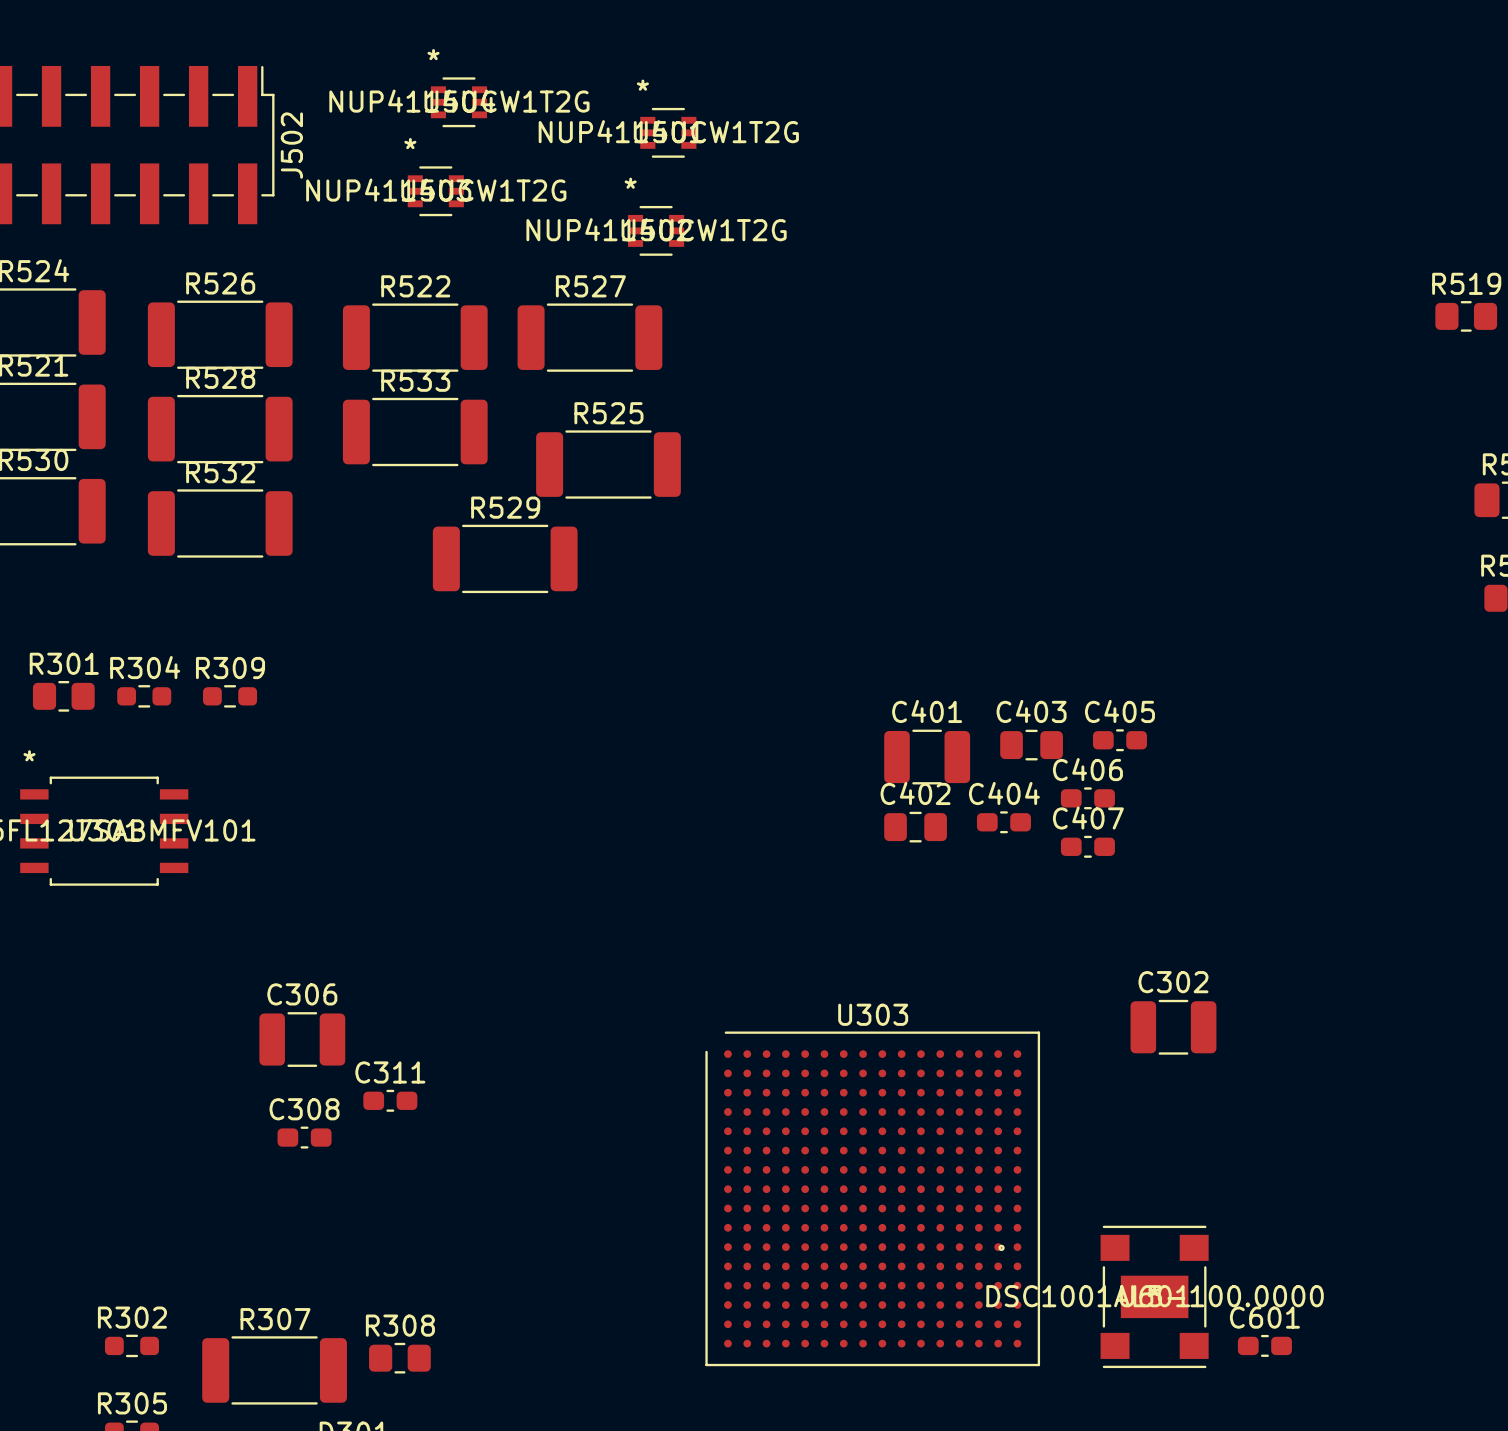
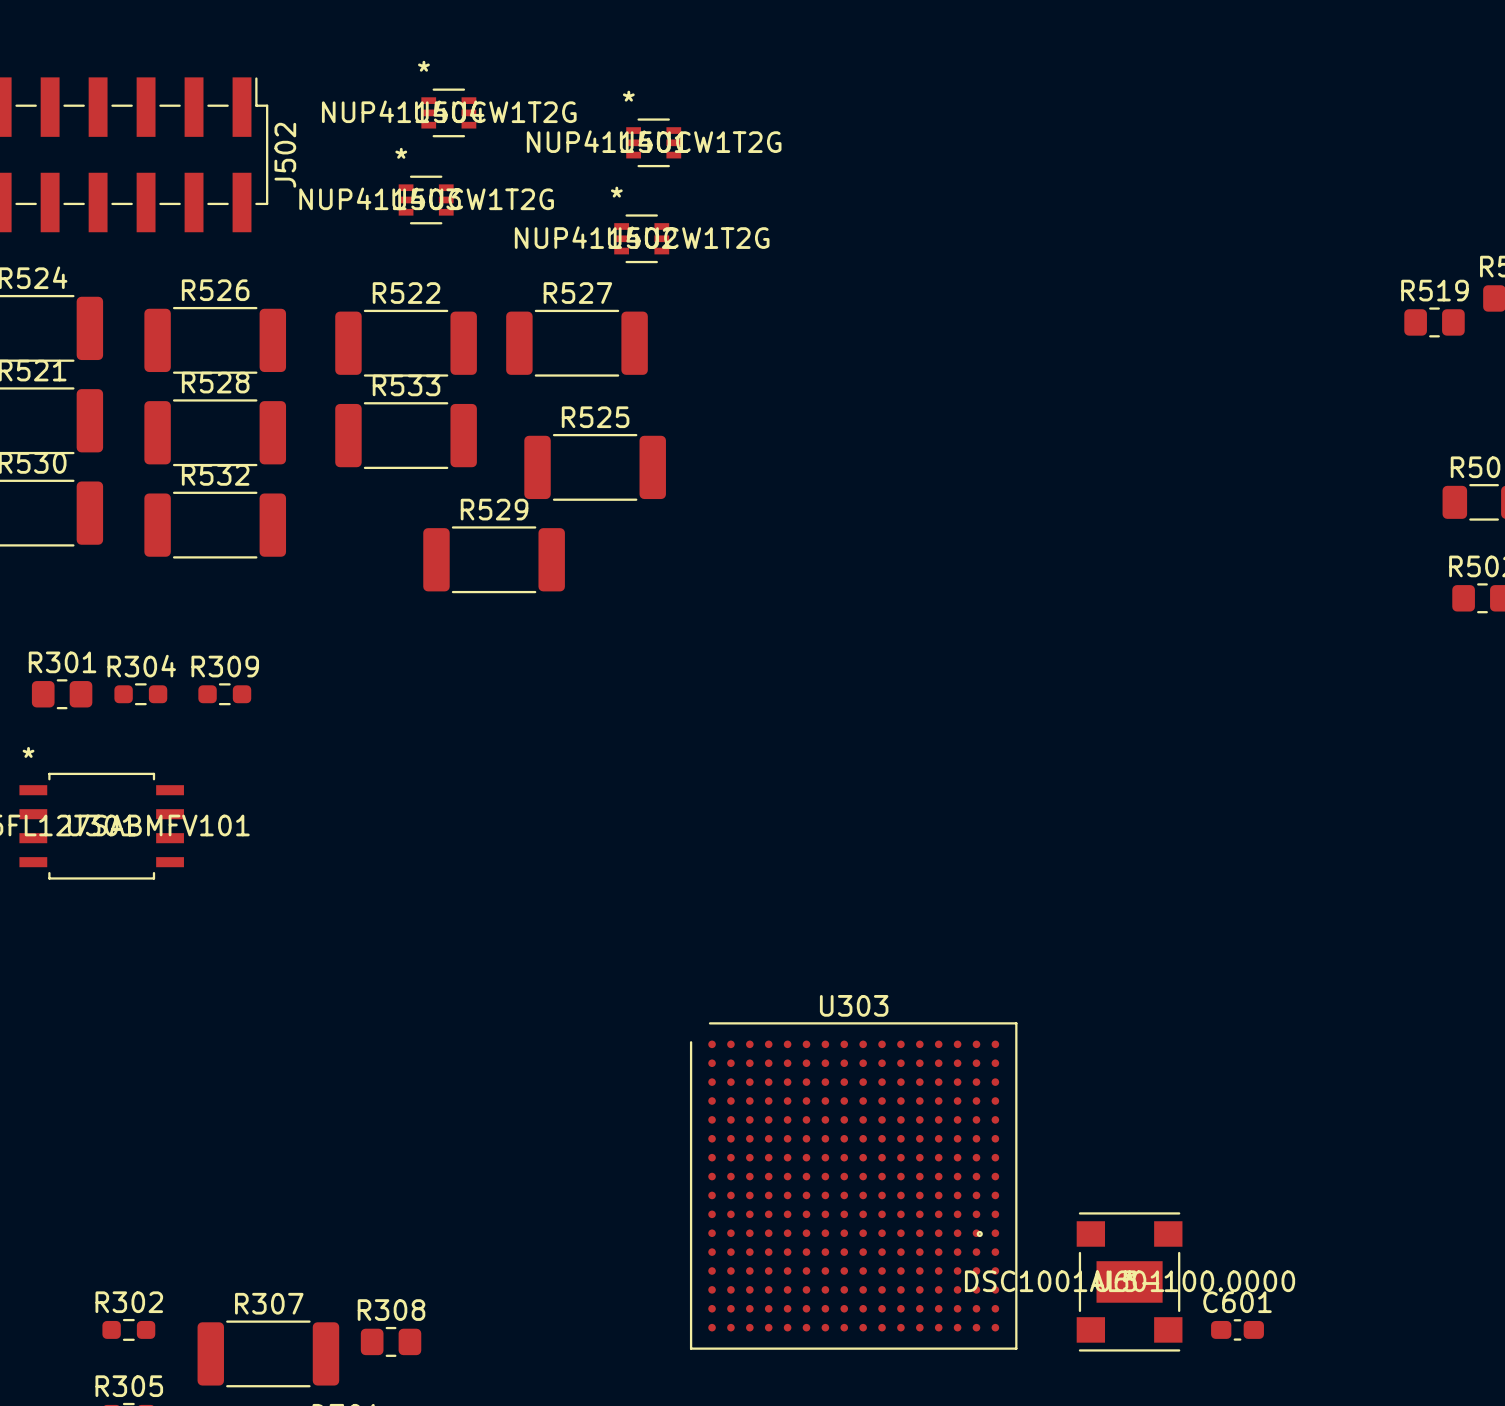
C405: (1119, 740) -> none
C403: (1031, 745) -> none
C401: (927, 757) -> none
C406: (1087, 798) -> none
C404: (1003, 822) -> none
C402: (915, 827) -> none
C407: (1087, 846) -> none
C302: (1173, 1027) -> none
C306: (302, 1039) -> none
C311: (390, 1100) -> none
C308: (304, 1137) -> none

